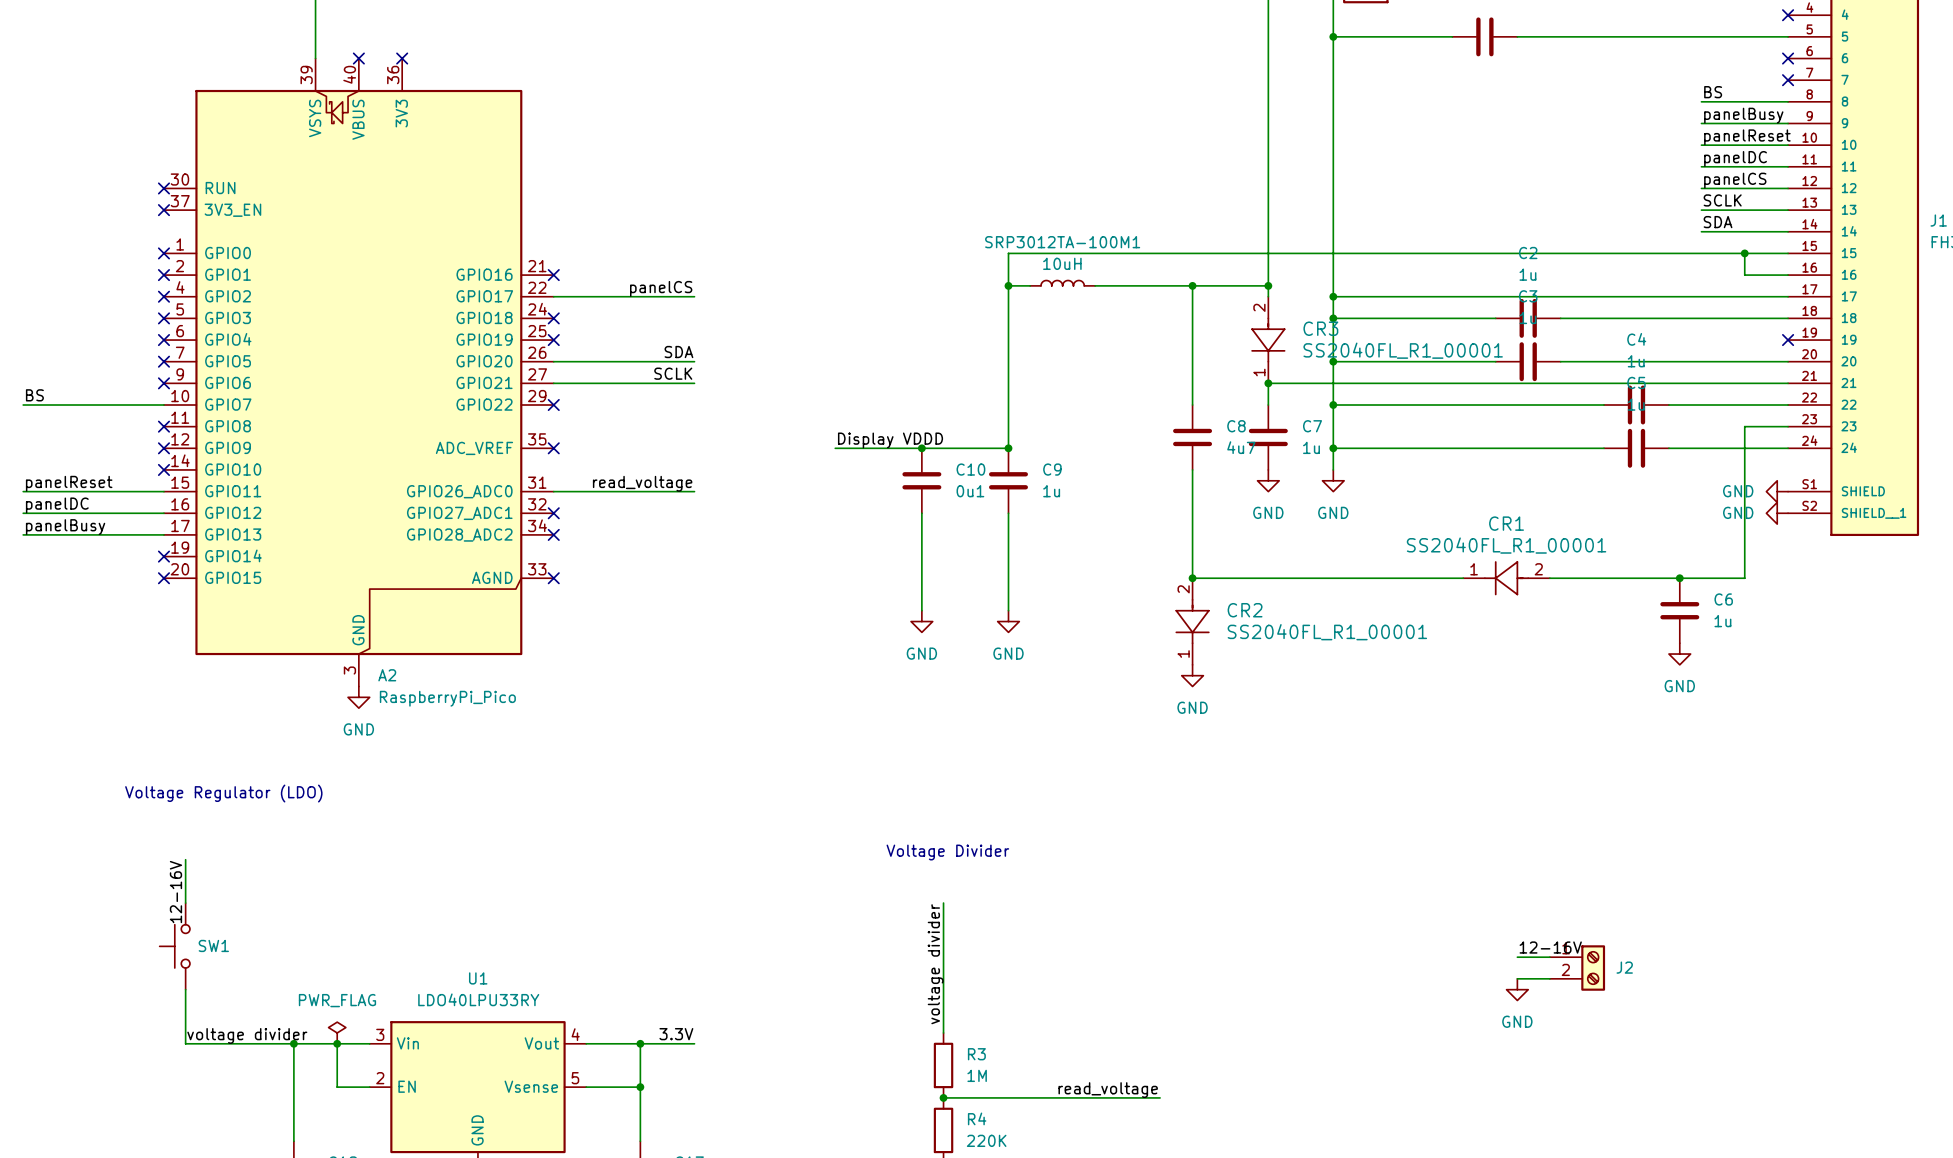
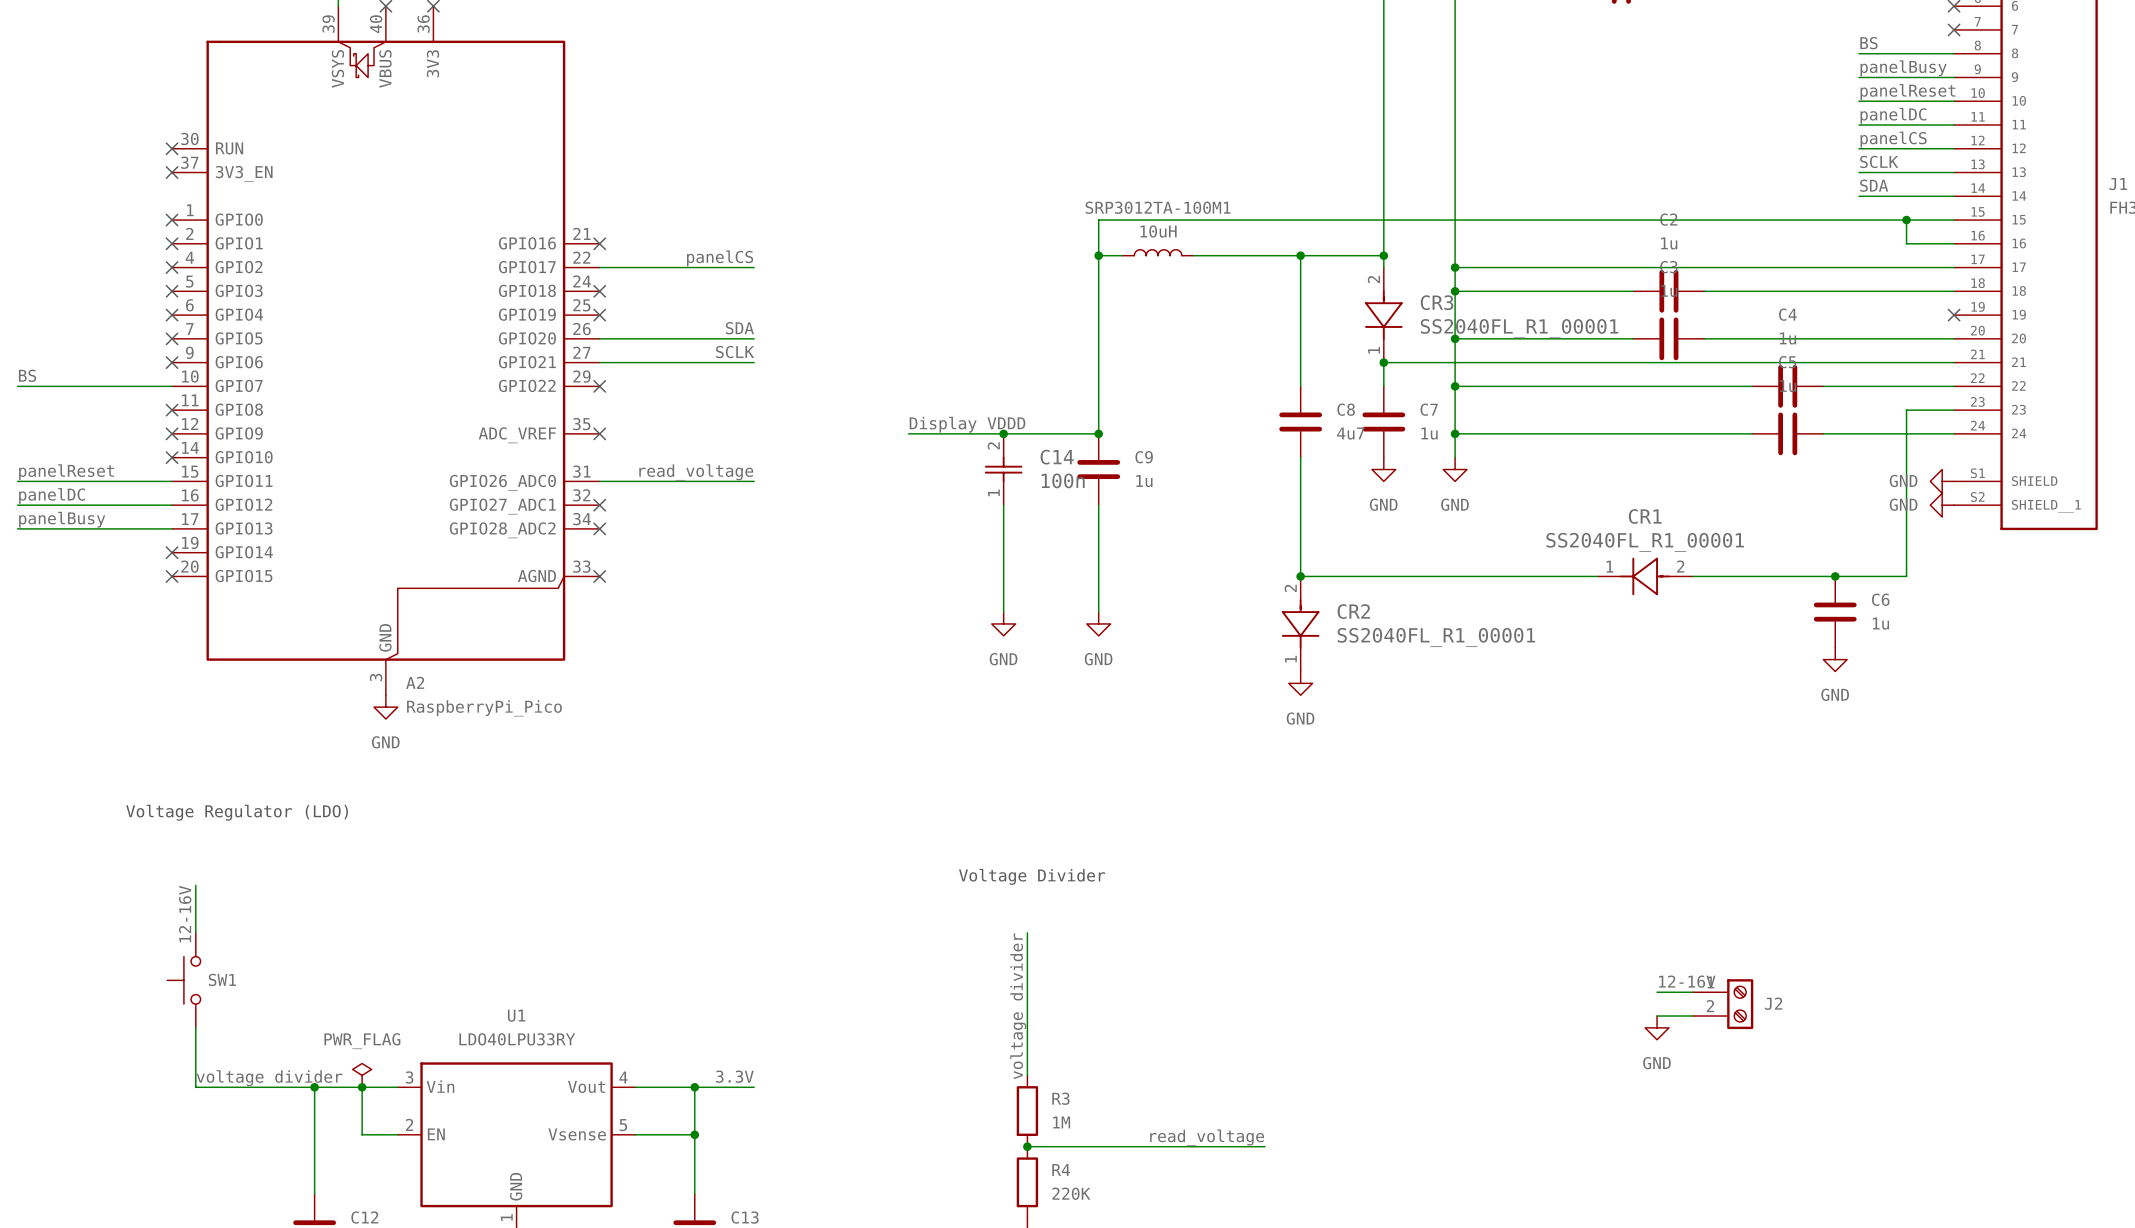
C10: 0u1 (921, 480) -> none
C14: none -> 100n (1003, 469)

